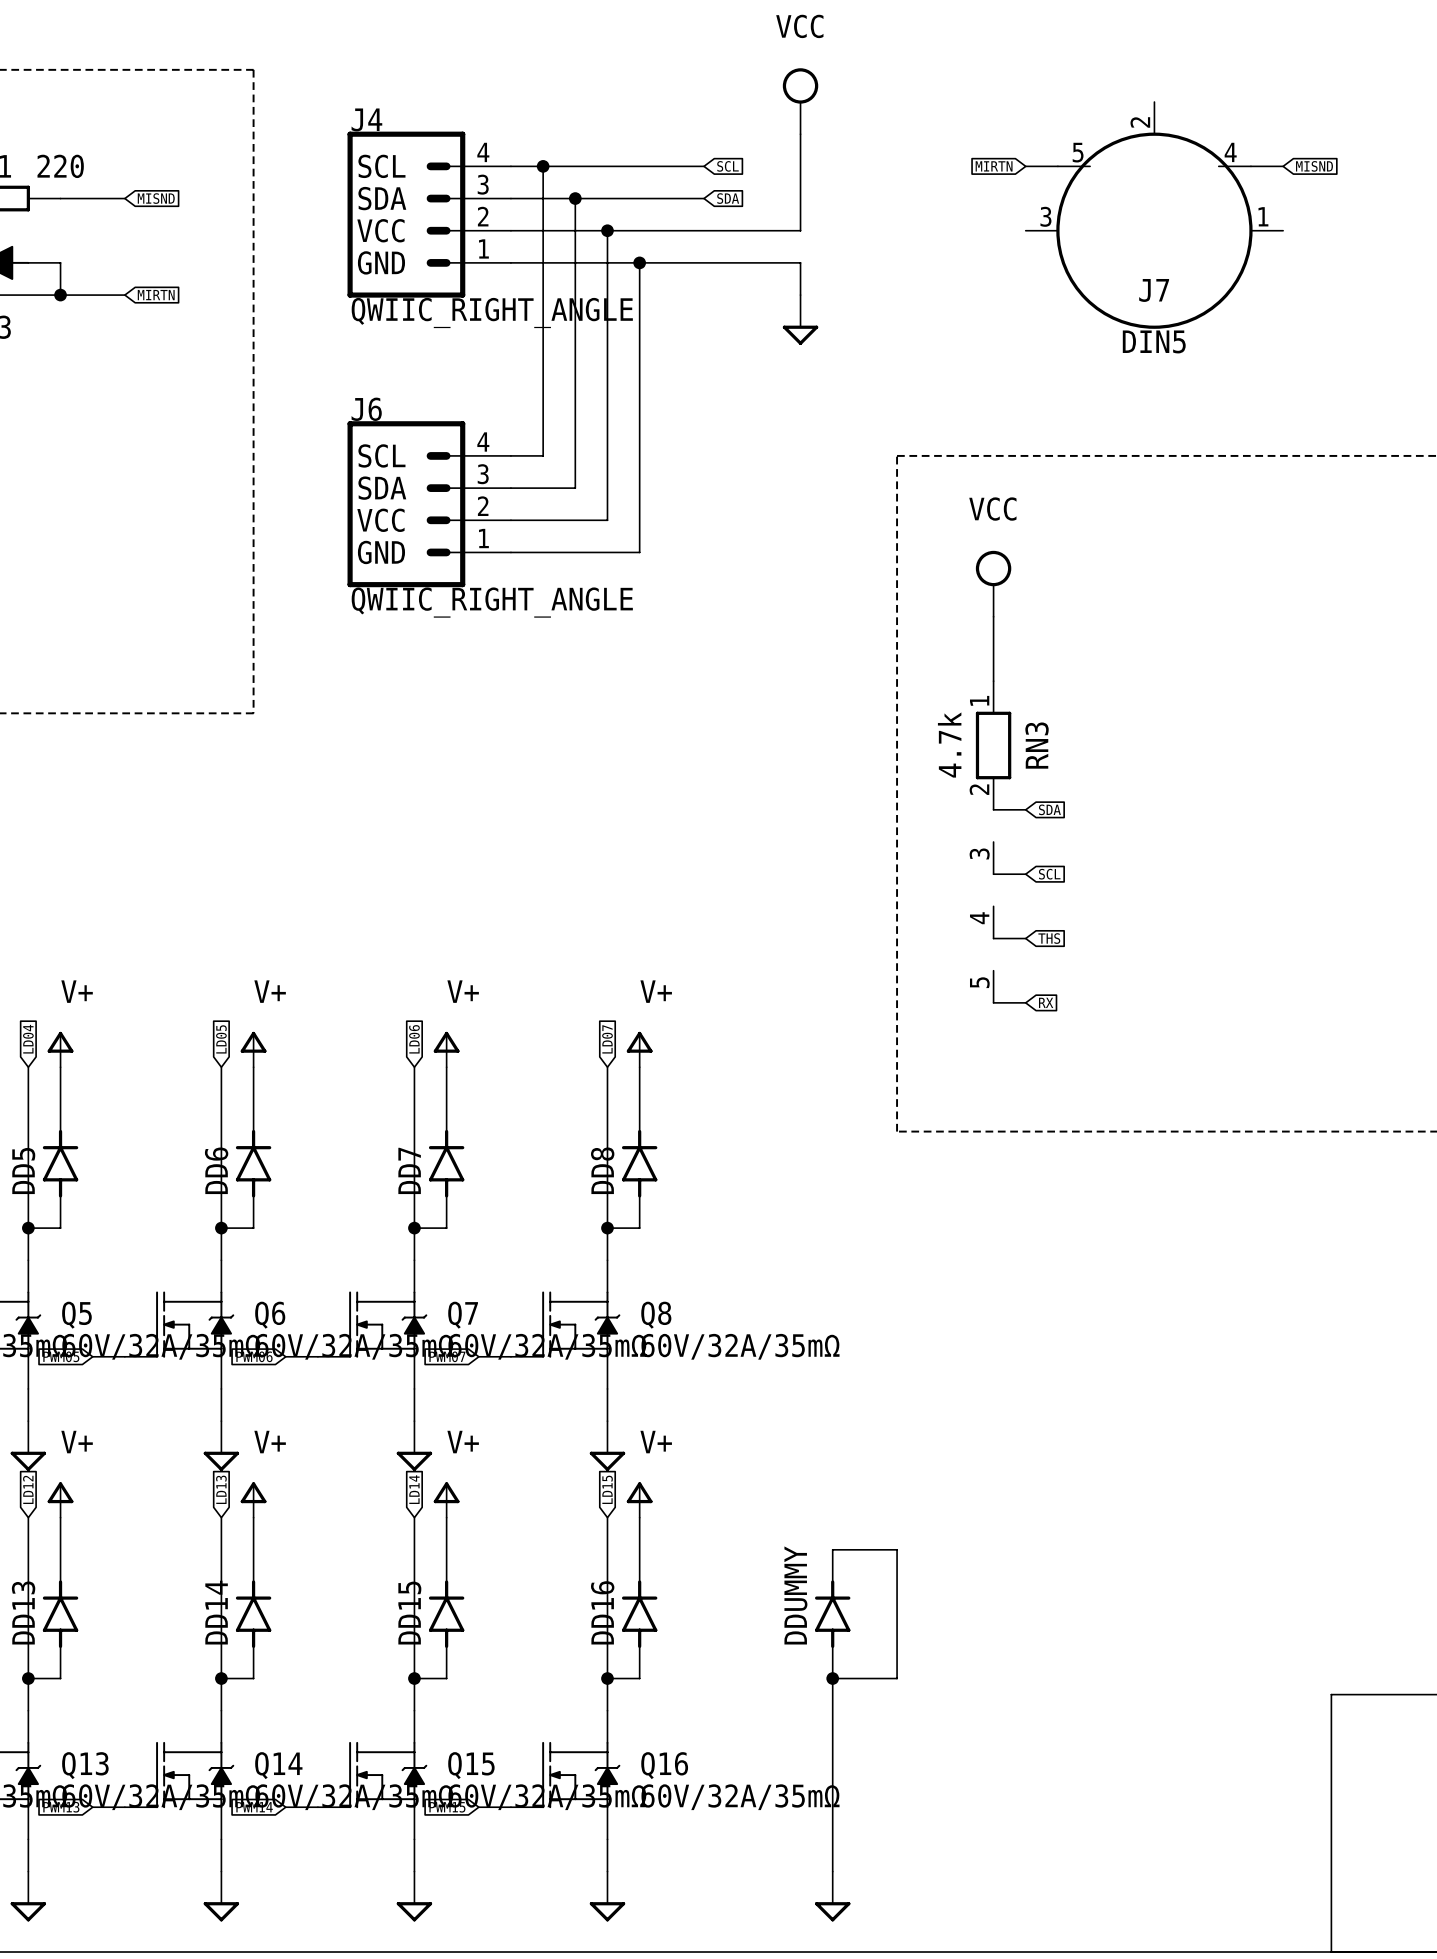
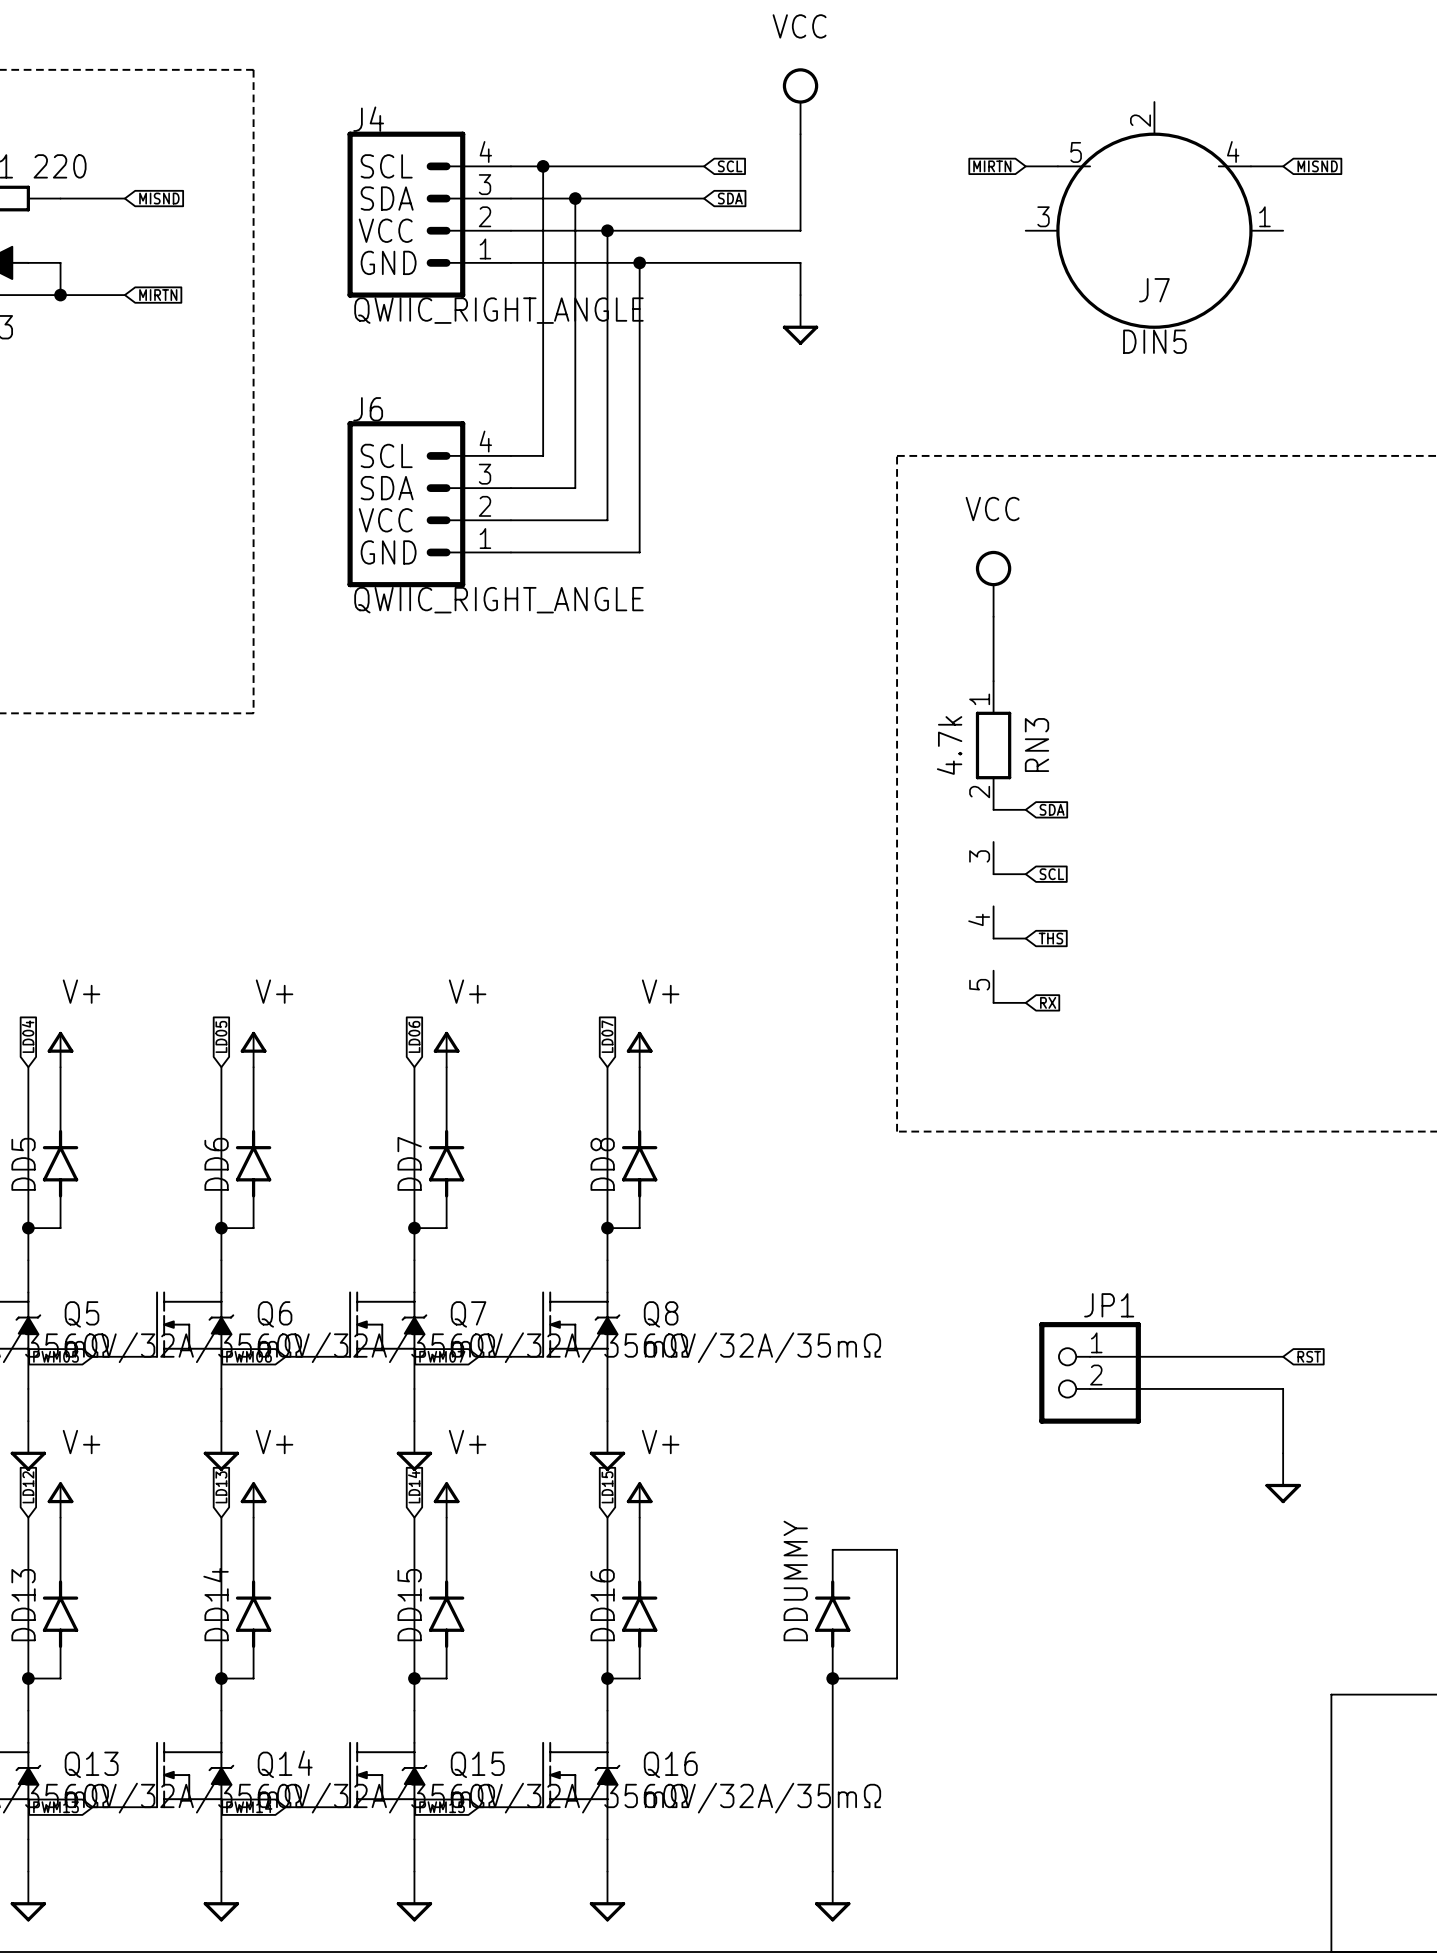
wire: none -> (1090, 1356) (1283, 1356)
global label: none -> RST (1309, 1356)
JP1: none -> (1090, 1372)
wire: none -> (1090, 1388) (1283, 1388) (1283, 1453)
power symbol: none -> (1283, 1478)

